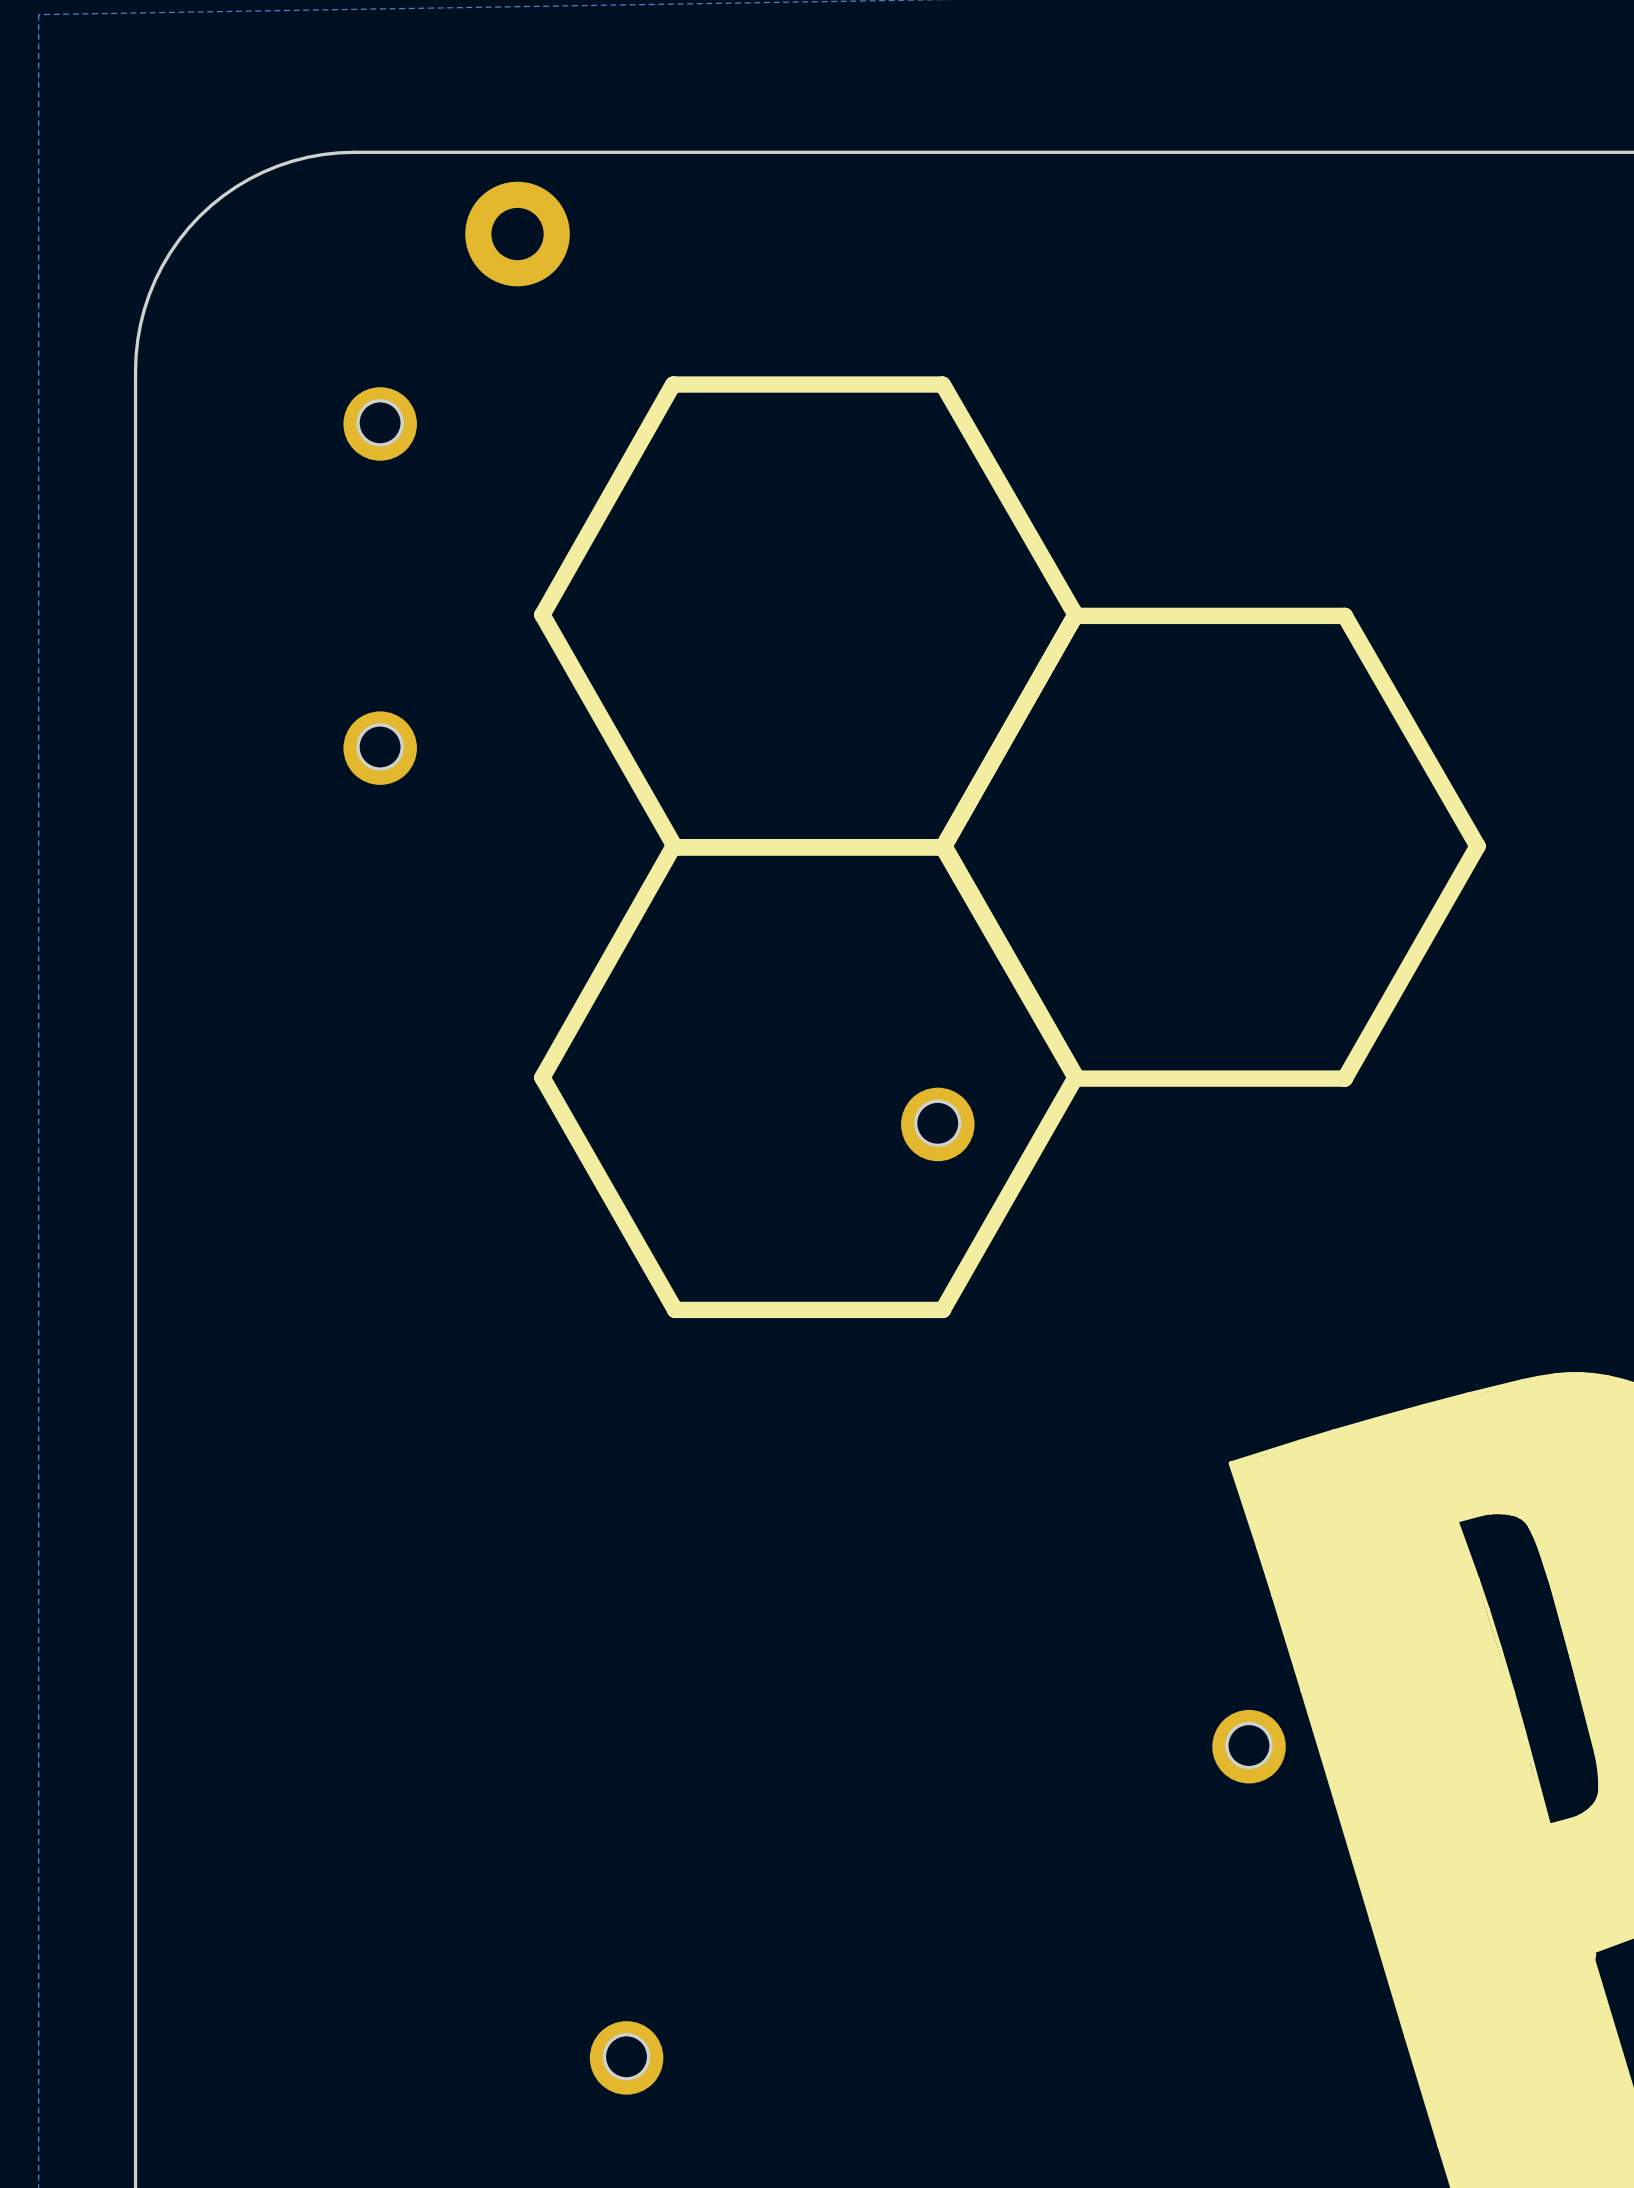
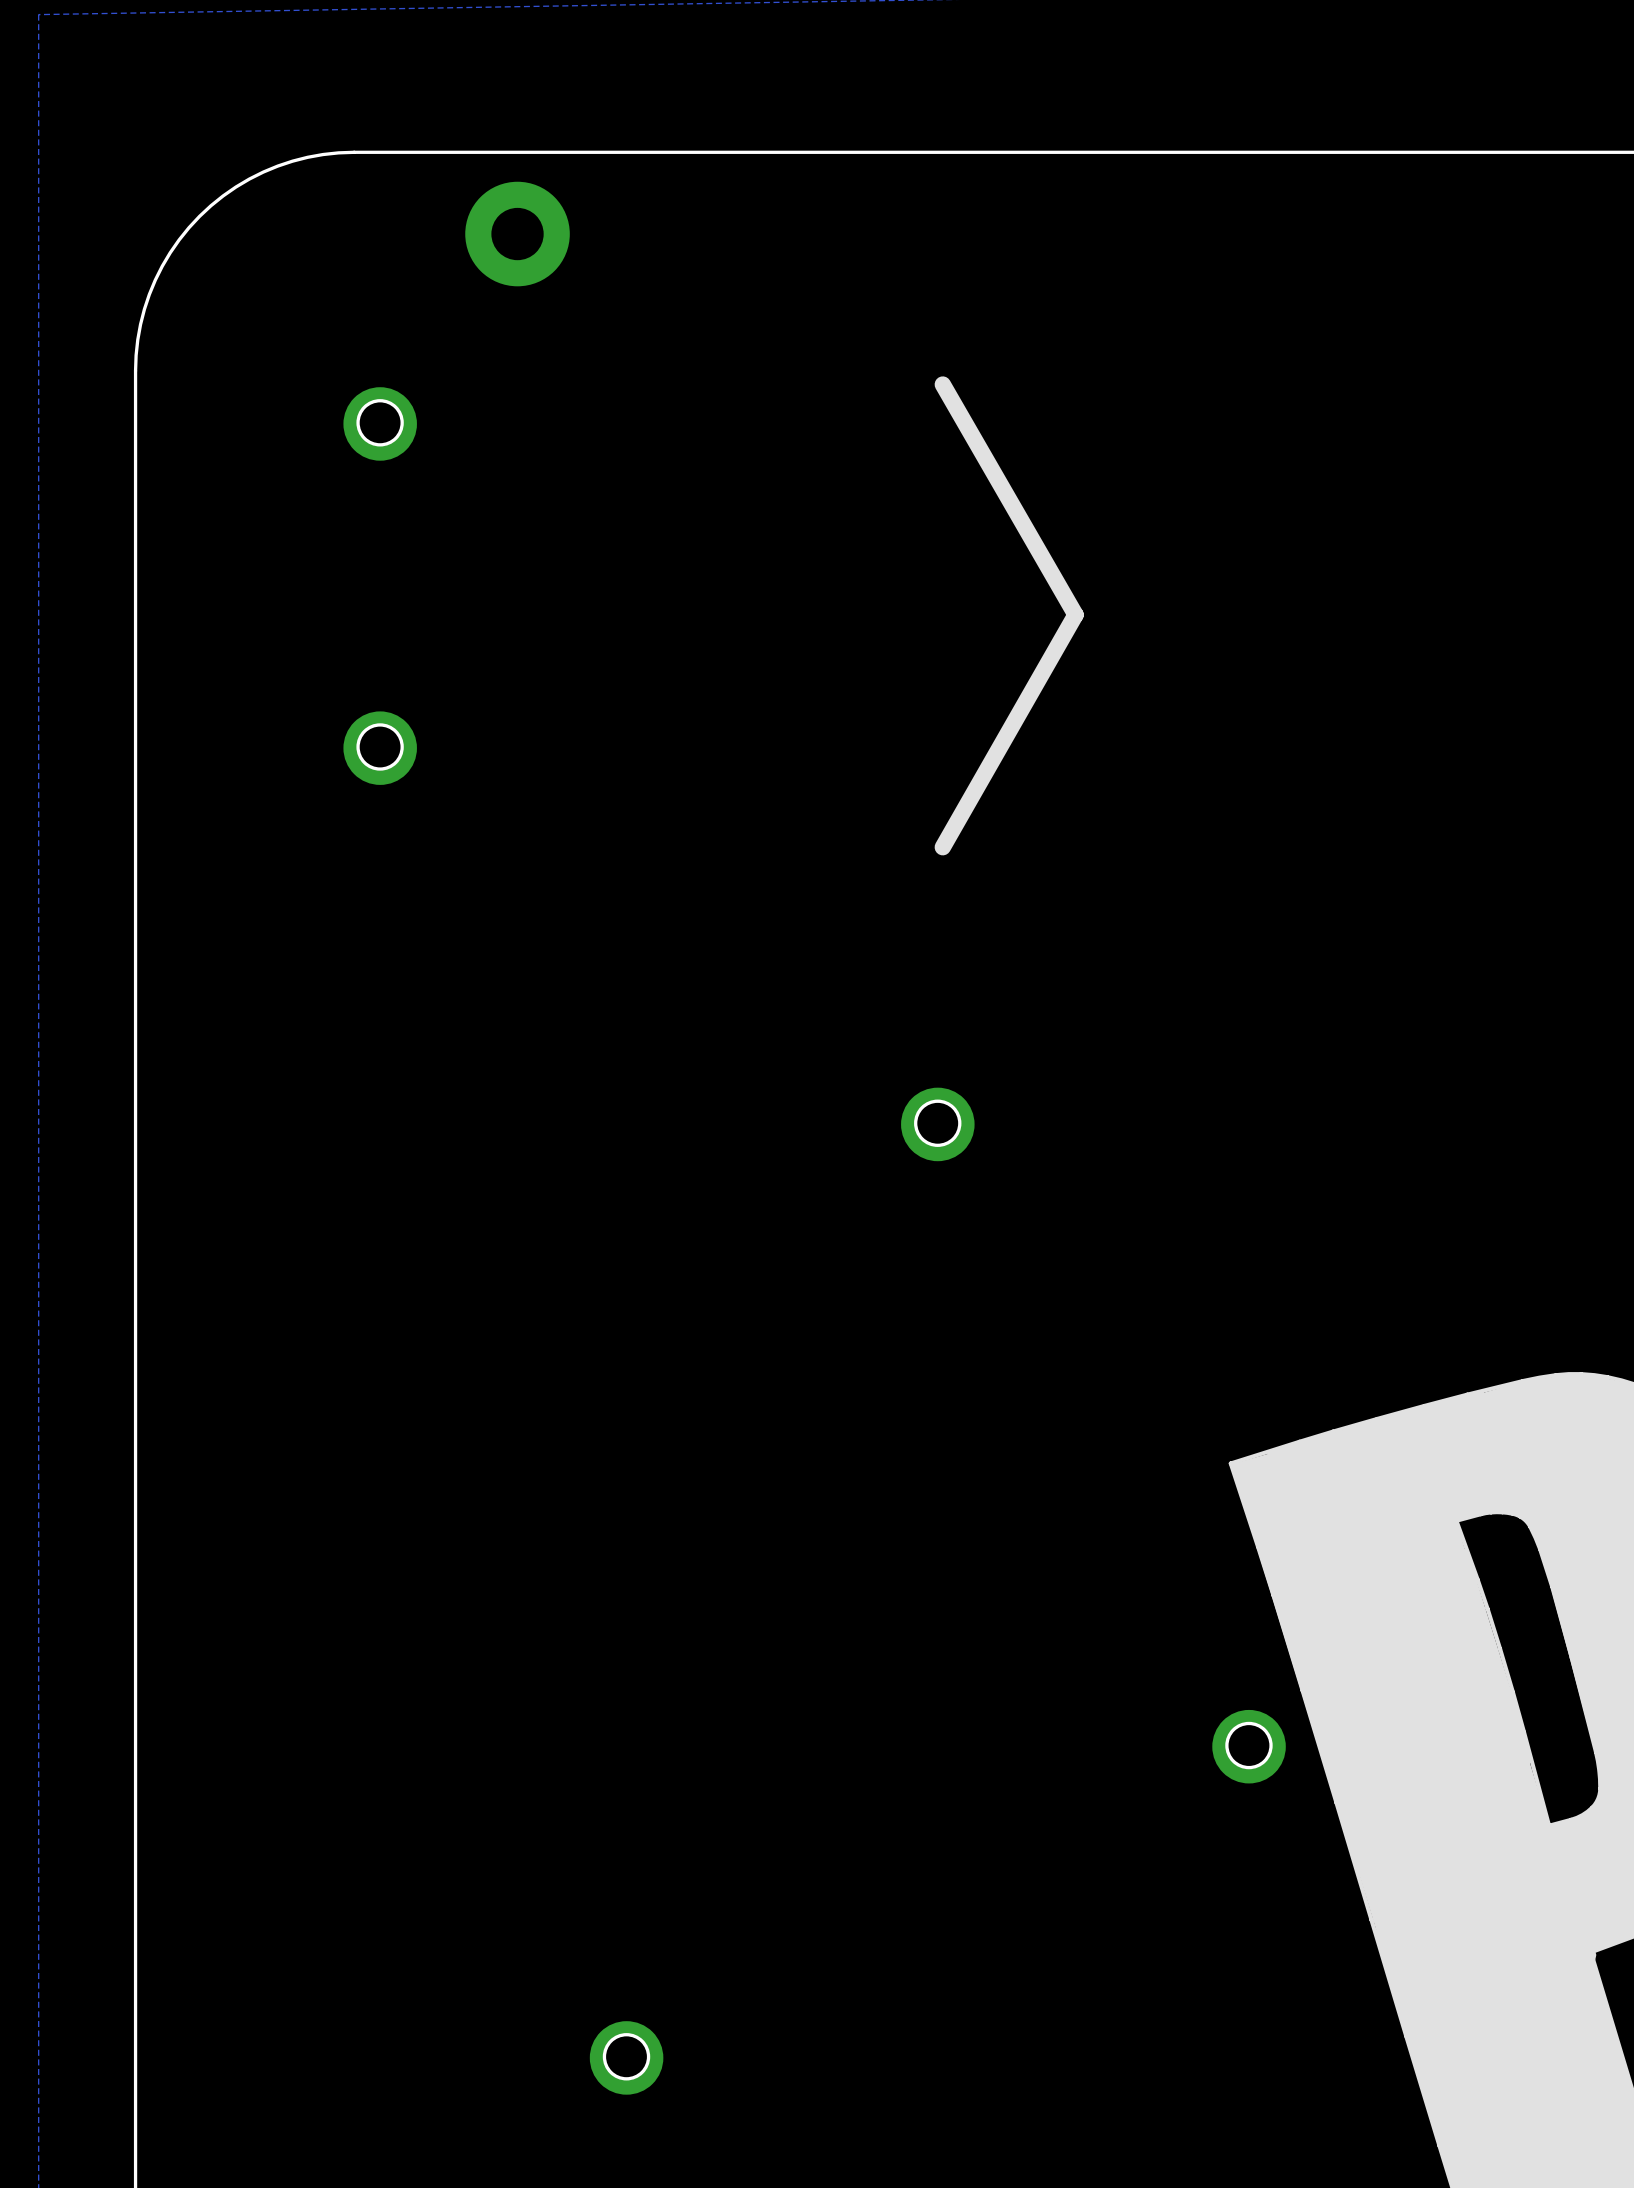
line: (673, 384) (542, 614) (675, 847) (942, 847) (1075, 1077) (942, 1309) (675, 1309) (542, 1077) (673, 847) -> none
line: (941, 384) (673, 384) -> none
line: (1077, 615) (1344, 615) (1477, 846) (1344, 1078) (1077, 1078) (944, 846) (1075, 615) -> none

